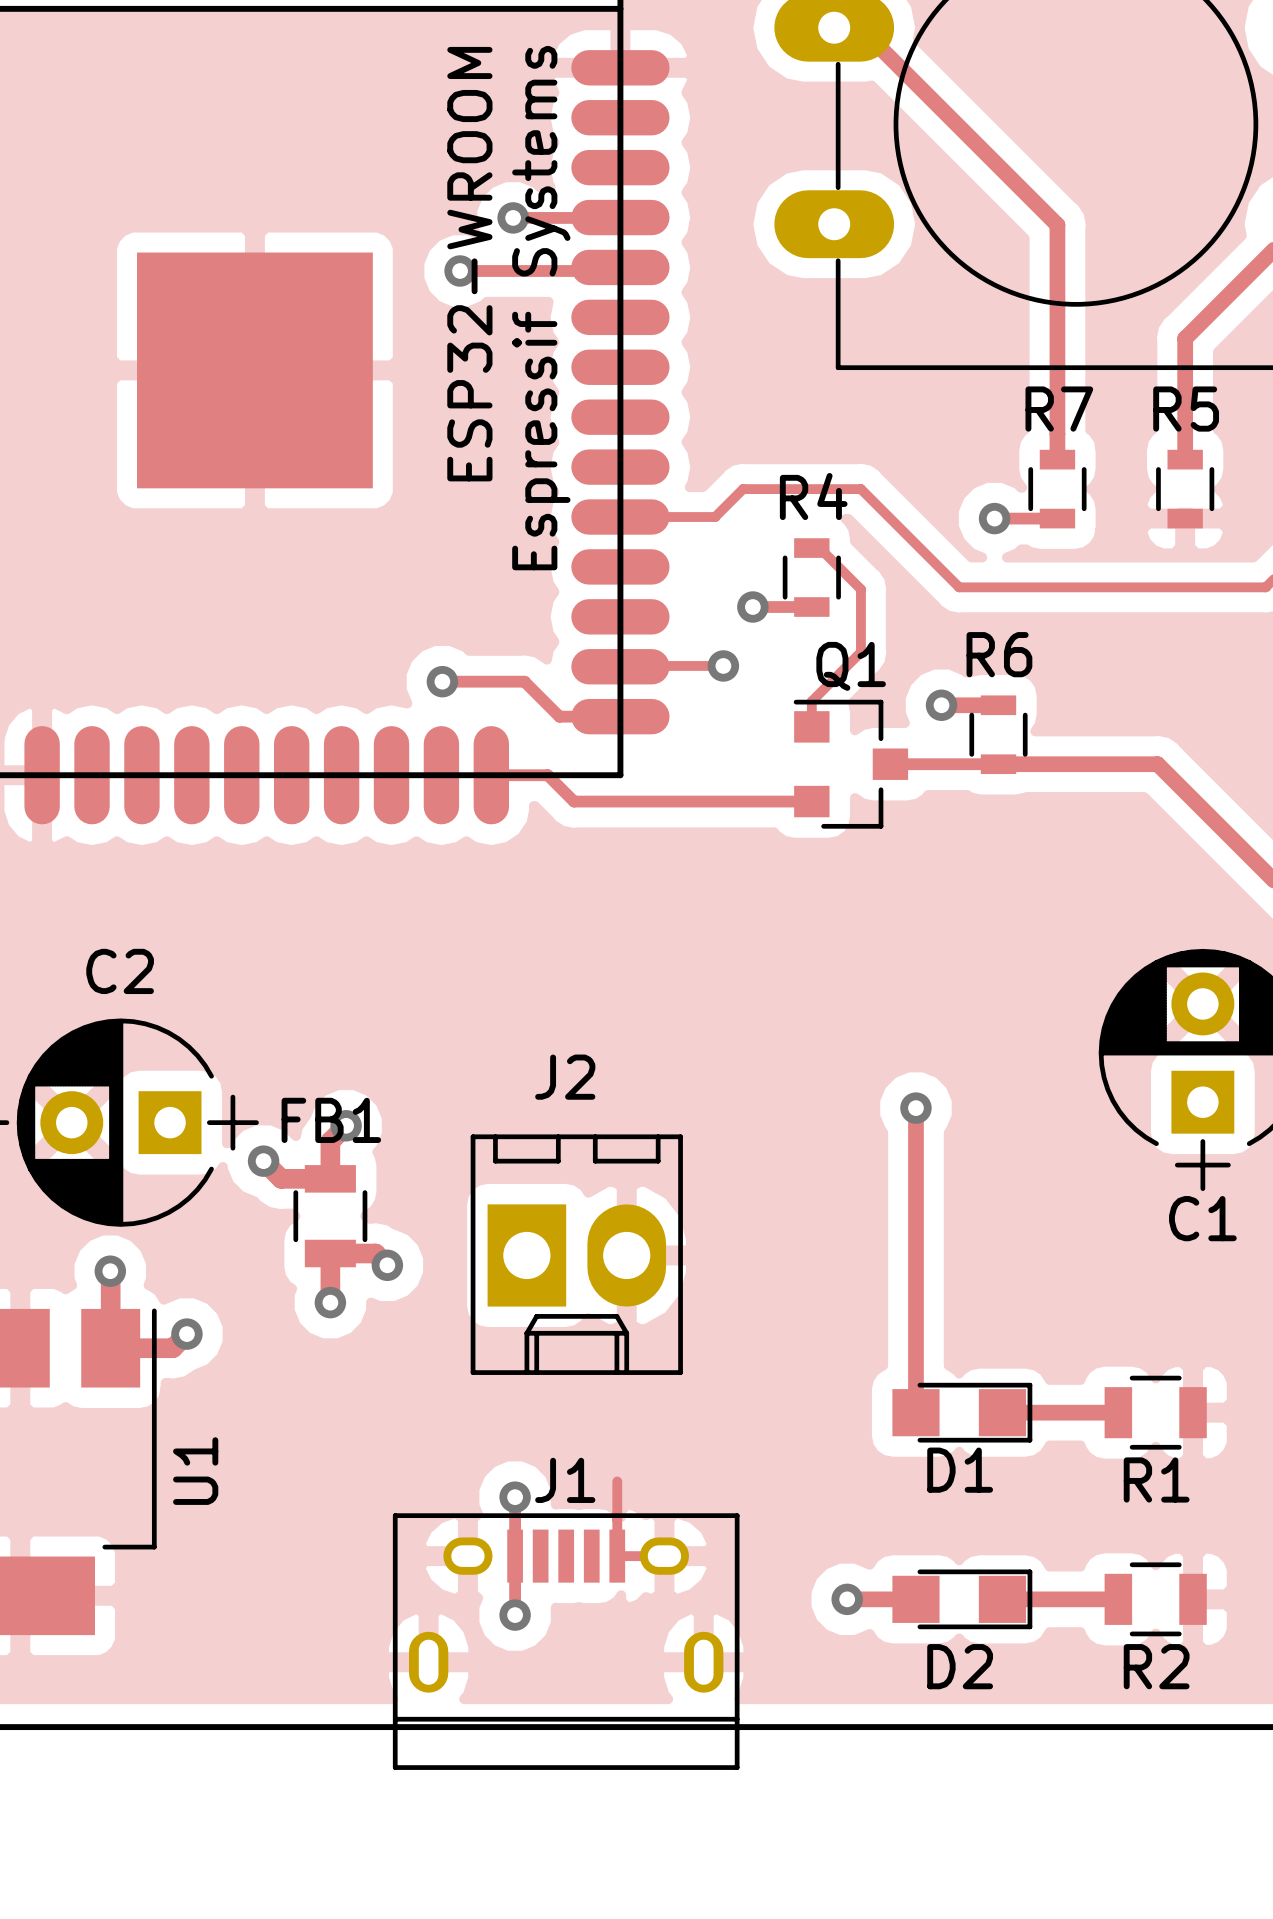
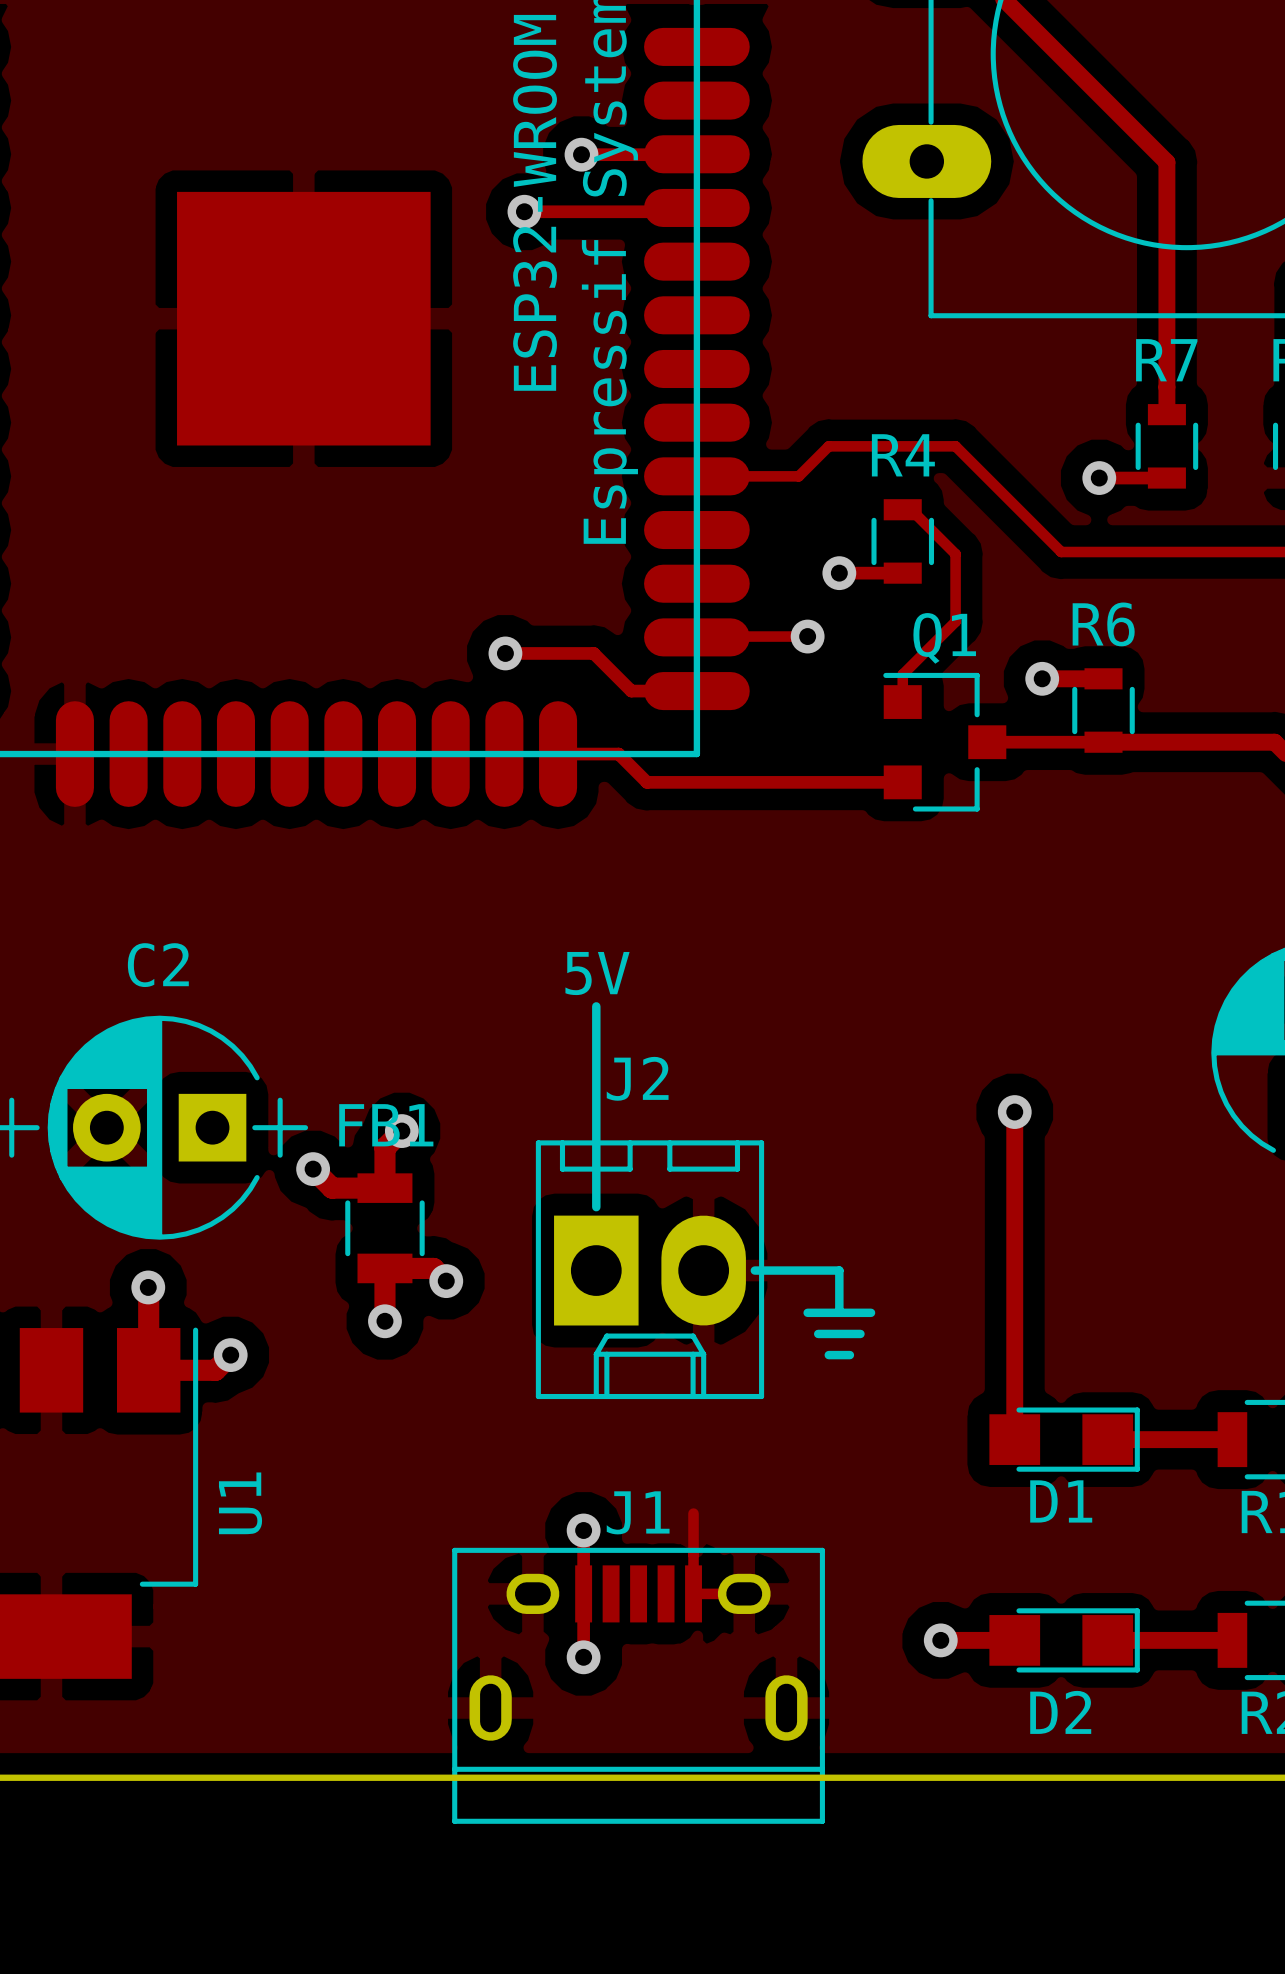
text: none -> 5V (597, 973)
line: none -> (596, 1006) (596, 1207)
line: none -> (754, 1270) (839, 1270) (839, 1312)
line: none -> (807, 1312) (871, 1312)
line: none -> (818, 1333) (860, 1333)
line: none -> (828, 1355) (849, 1355)

